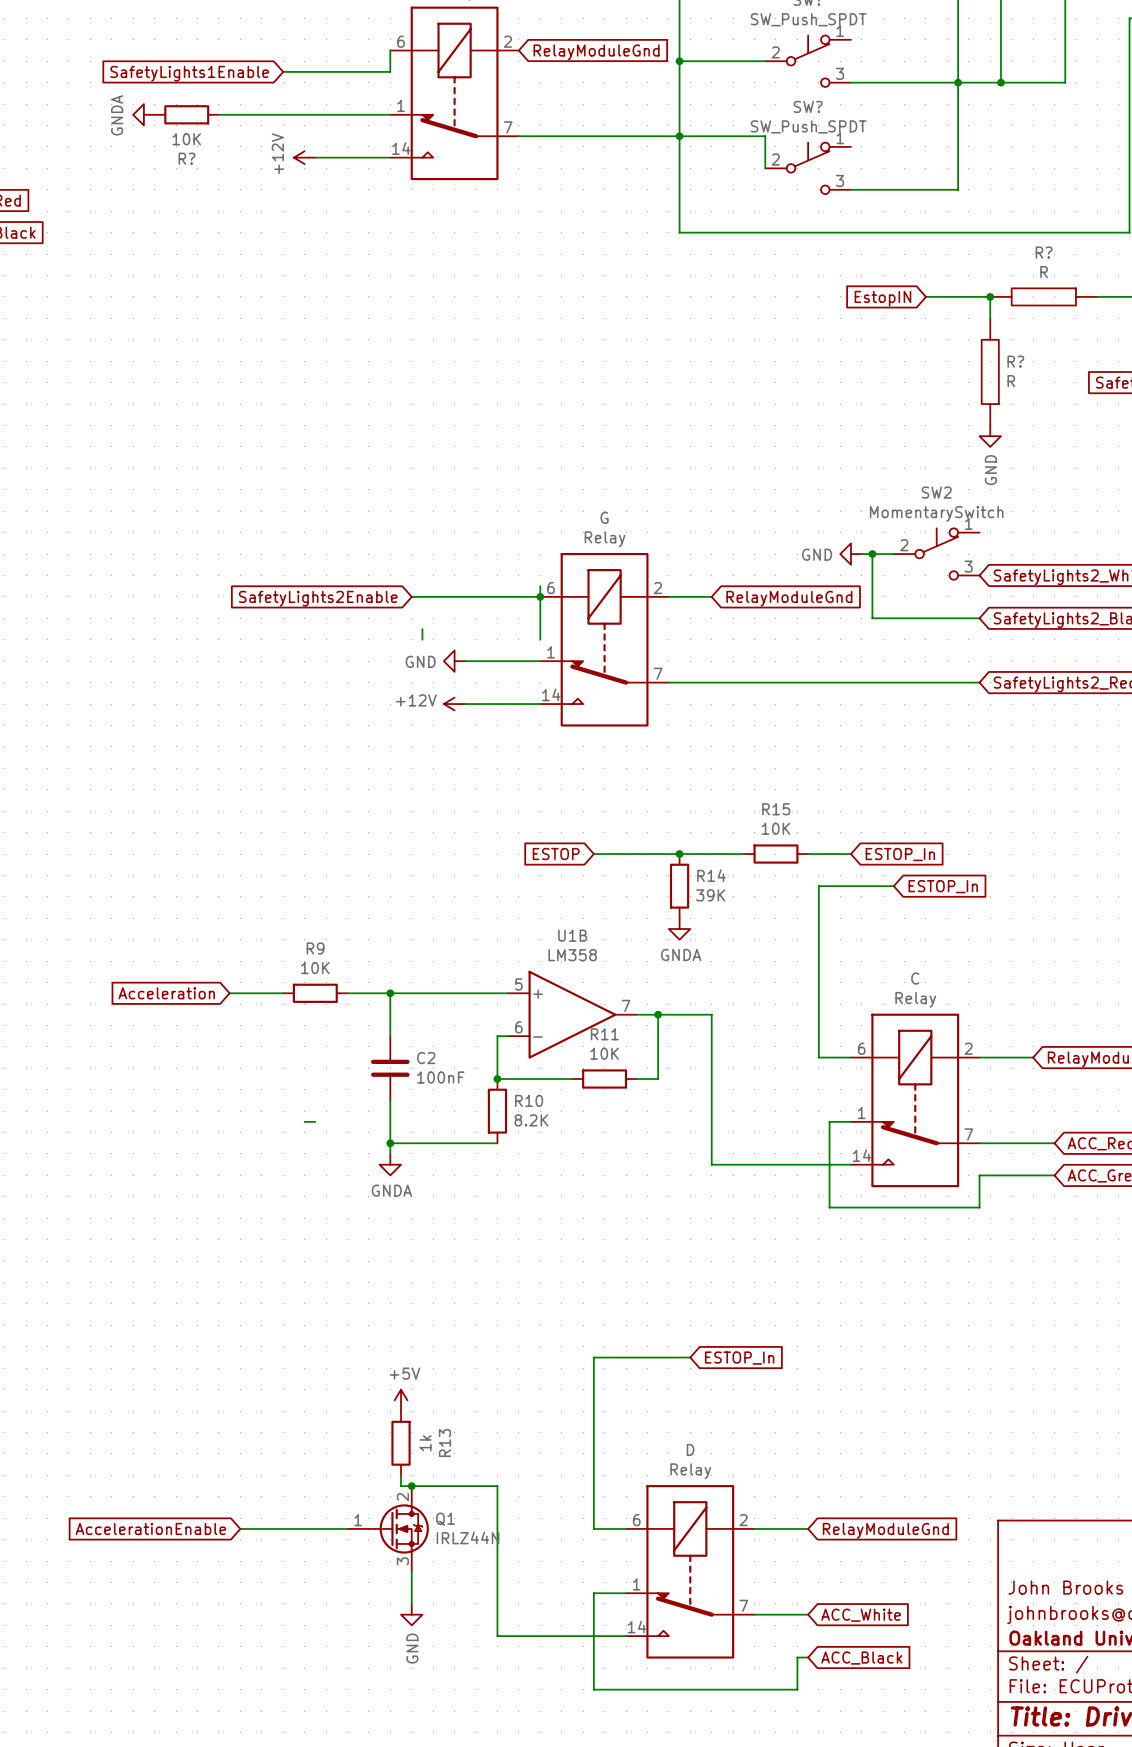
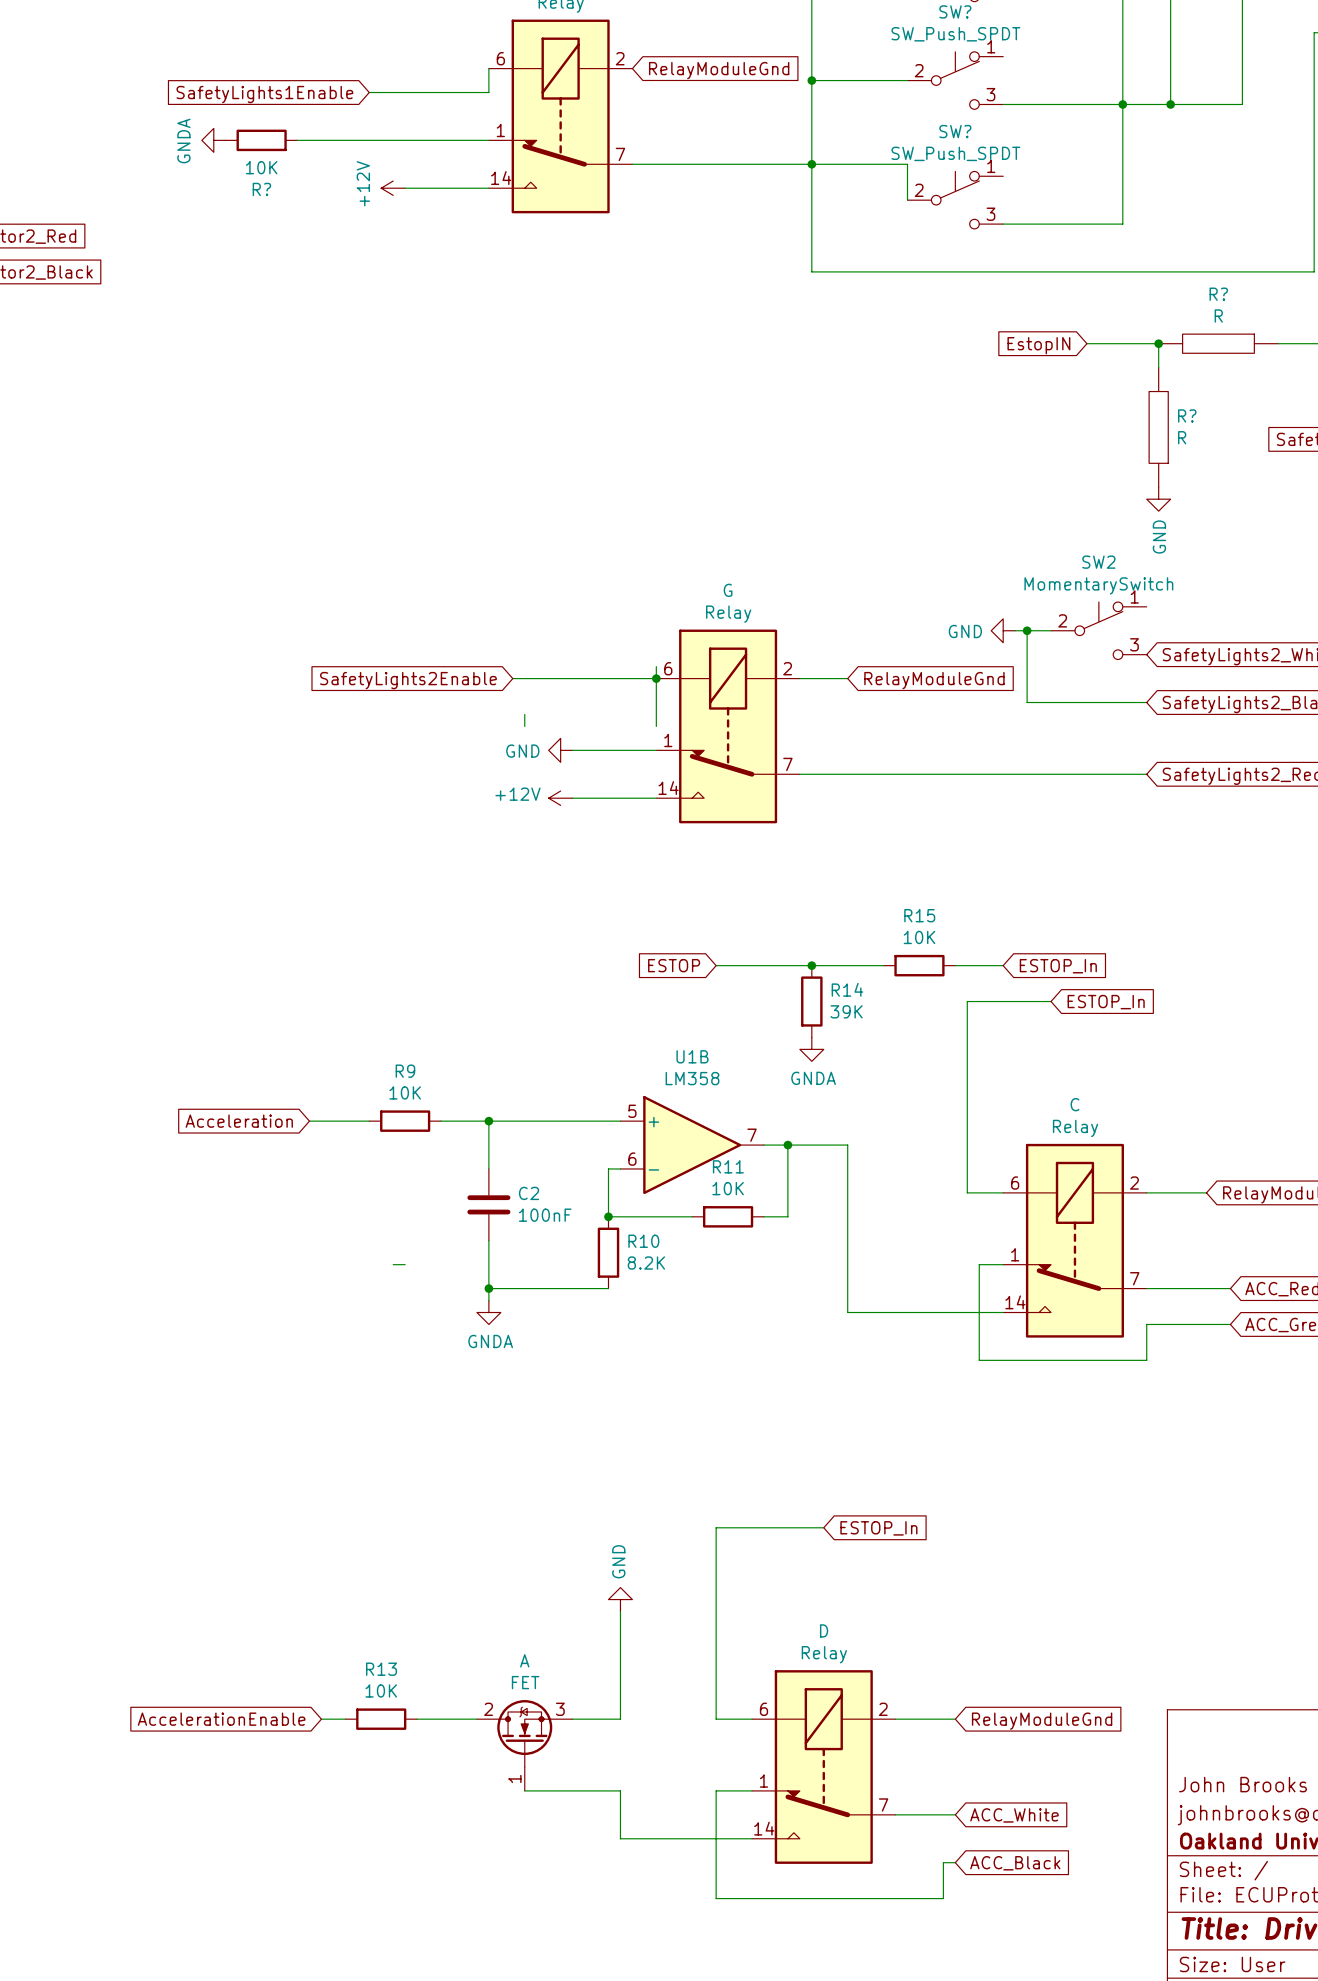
power symbol: +5V (401, 1400) -> none
power symbol: none -> GND (620, 1599)
wire: none -> (620, 1611) (620, 1719) (572, 1719)
R13 rotation: 0° (401, 1443) -> 90° clockwise (381, 1719)
R13 position: (401, 1443) -> (381, 1719)
R13 value: 1k (425, 1443) -> 10K (381, 1690)
R13 name position: R13 (444, 1443) -> R13 (381, 1669)
wire: (401, 1475) (401, 1486) (497, 1486) (497, 1636) (508, 1636) -> (524, 1790) (620, 1790) (620, 1838)
junction: (411, 1486) -> none
wire: (261, 1528) (326, 1528) -> none
Q1: IRLZ44N (388, 1528) -> none
A: none -> FET (524, 1745)
wire: (411, 1571) (411, 1603) -> none
power symbol: GND (411, 1614) -> none

